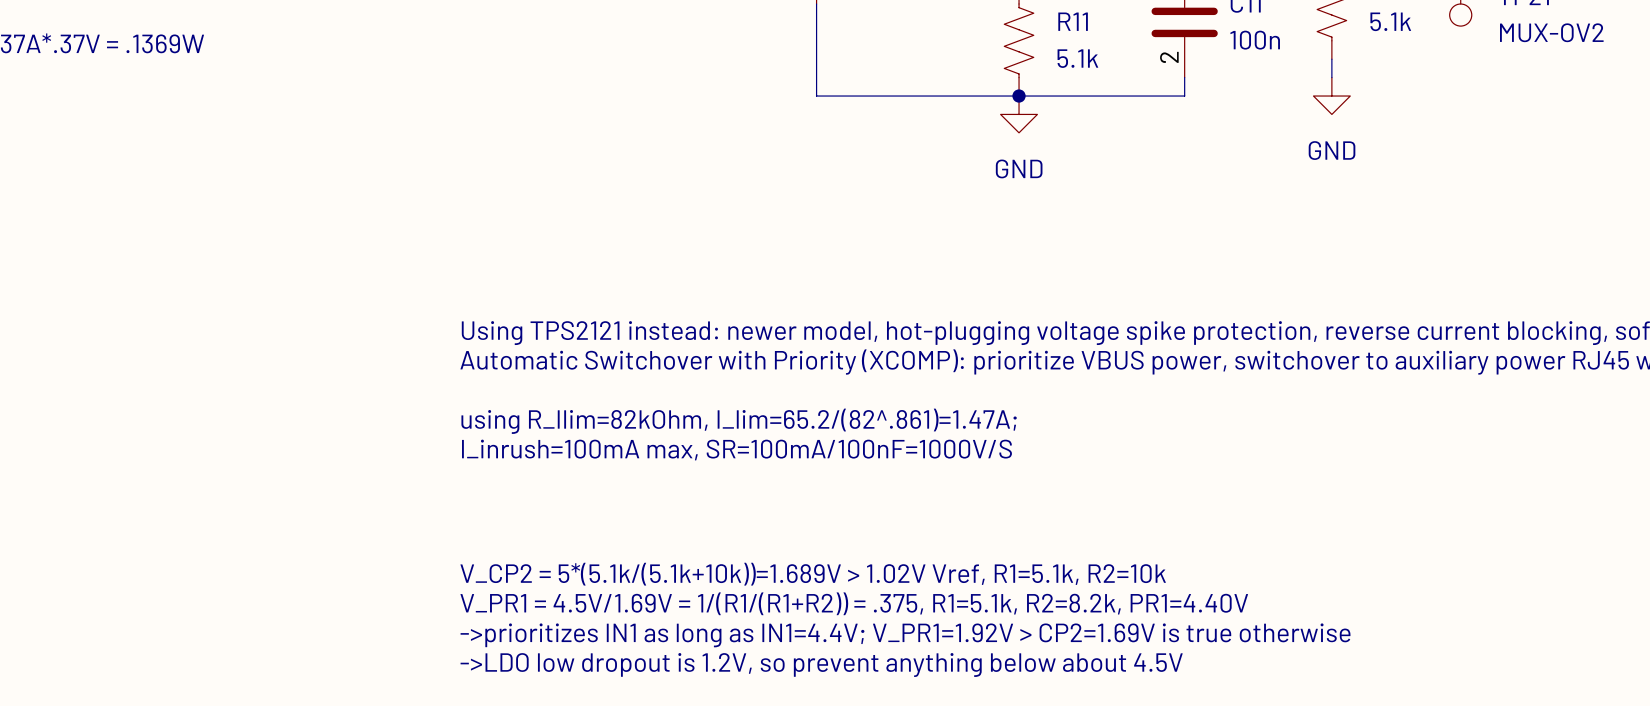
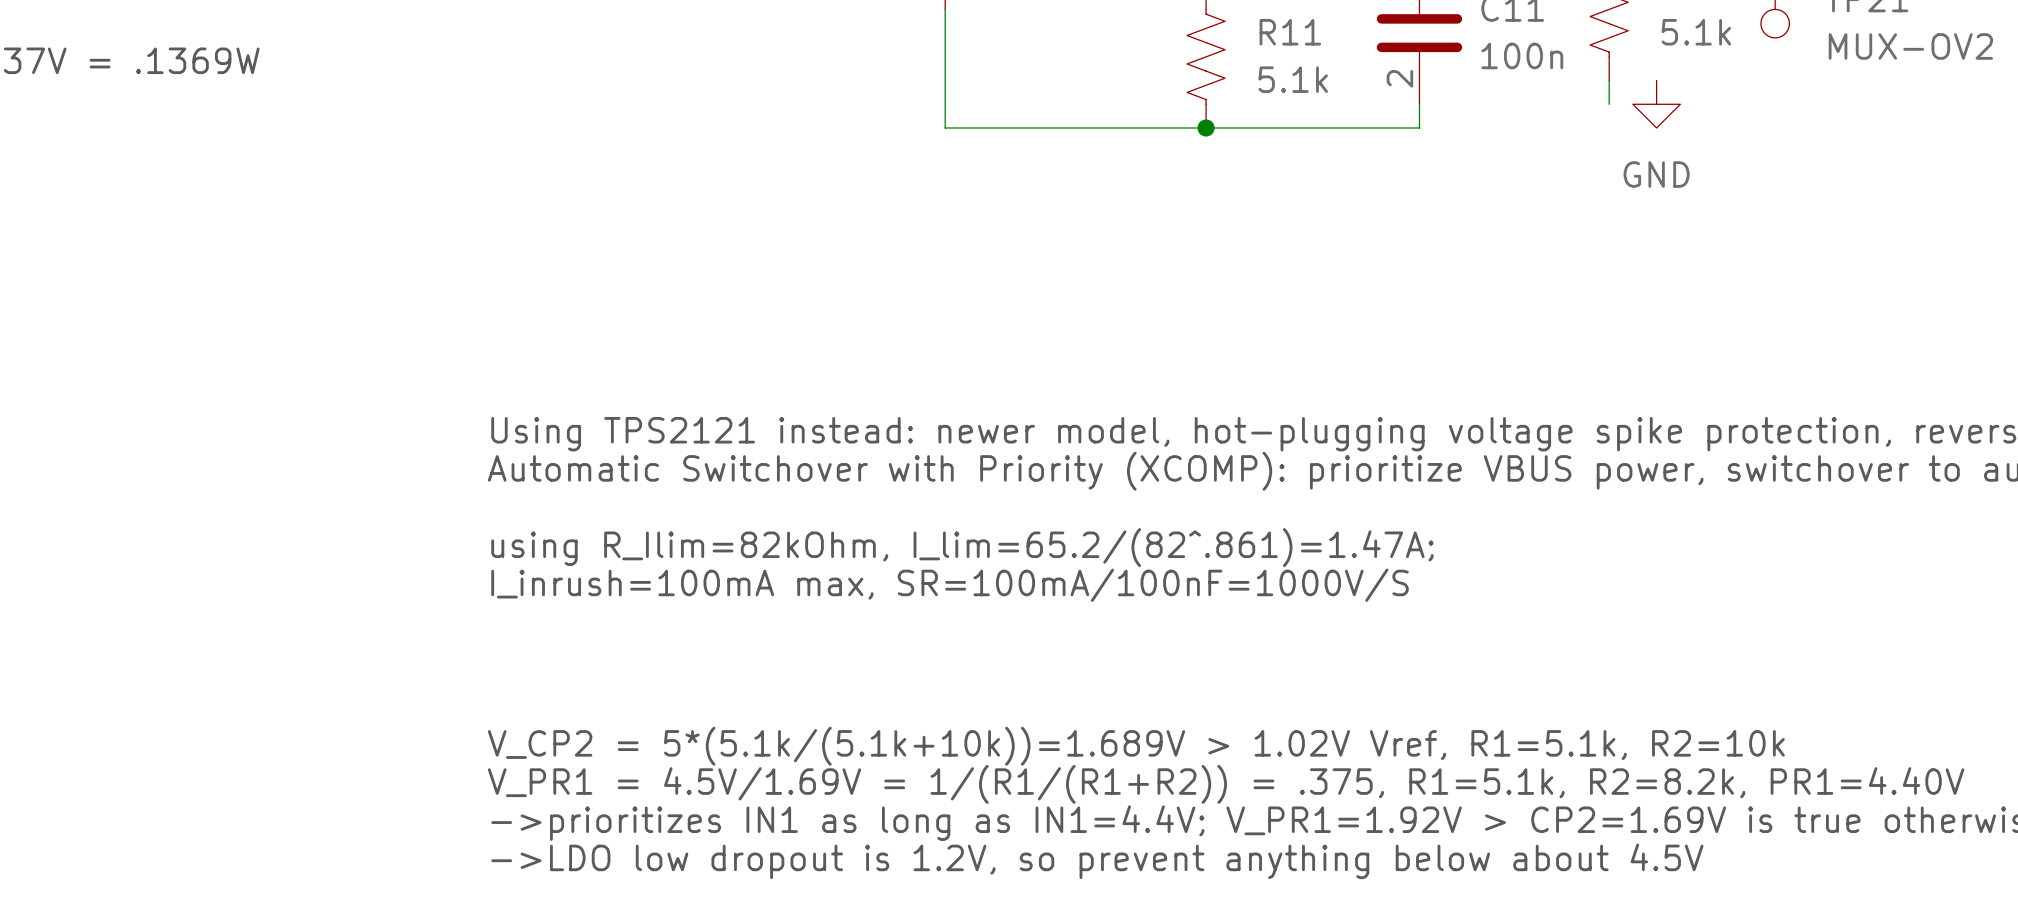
power symbol position: GND (1331, 96) -> GND (1656, 104)
power symbol: GND (1019, 114) -> none

